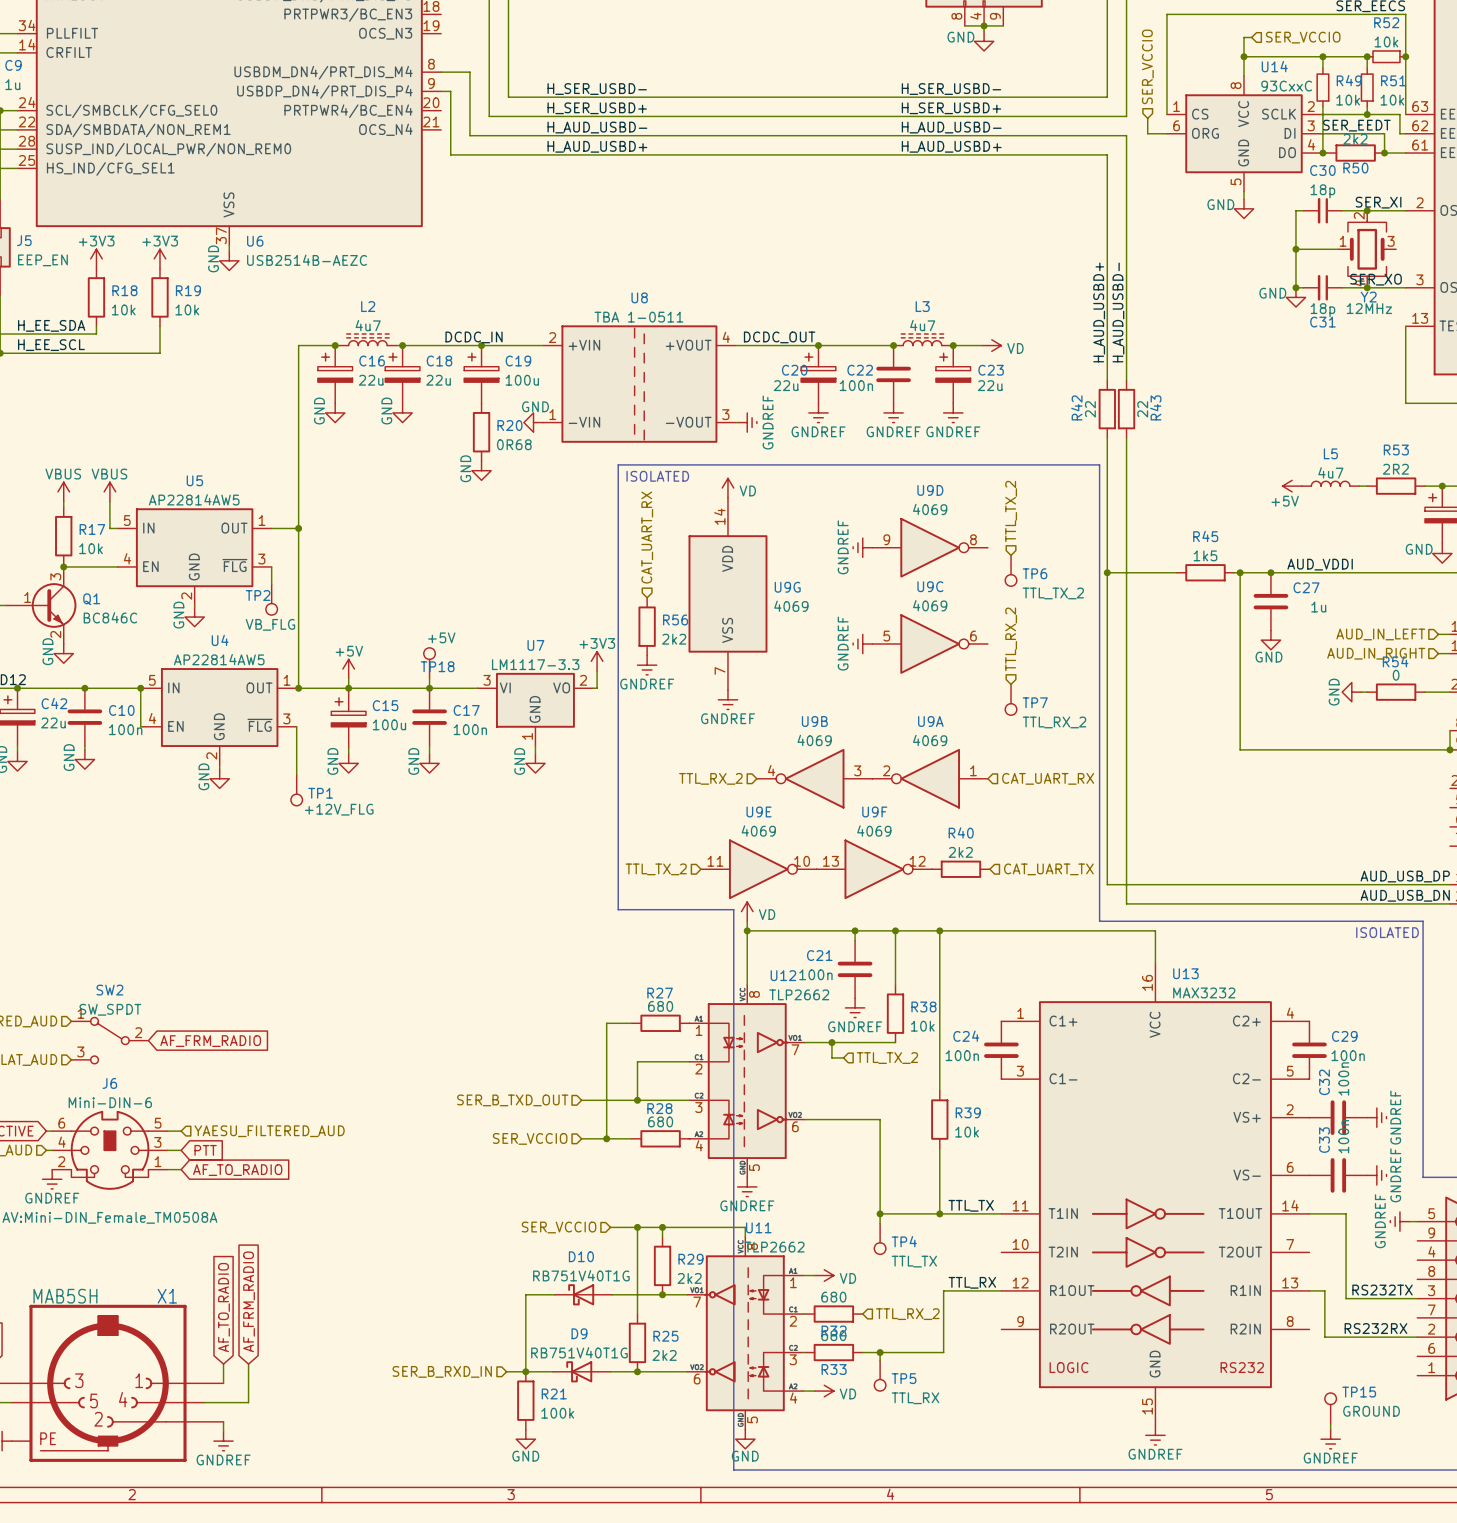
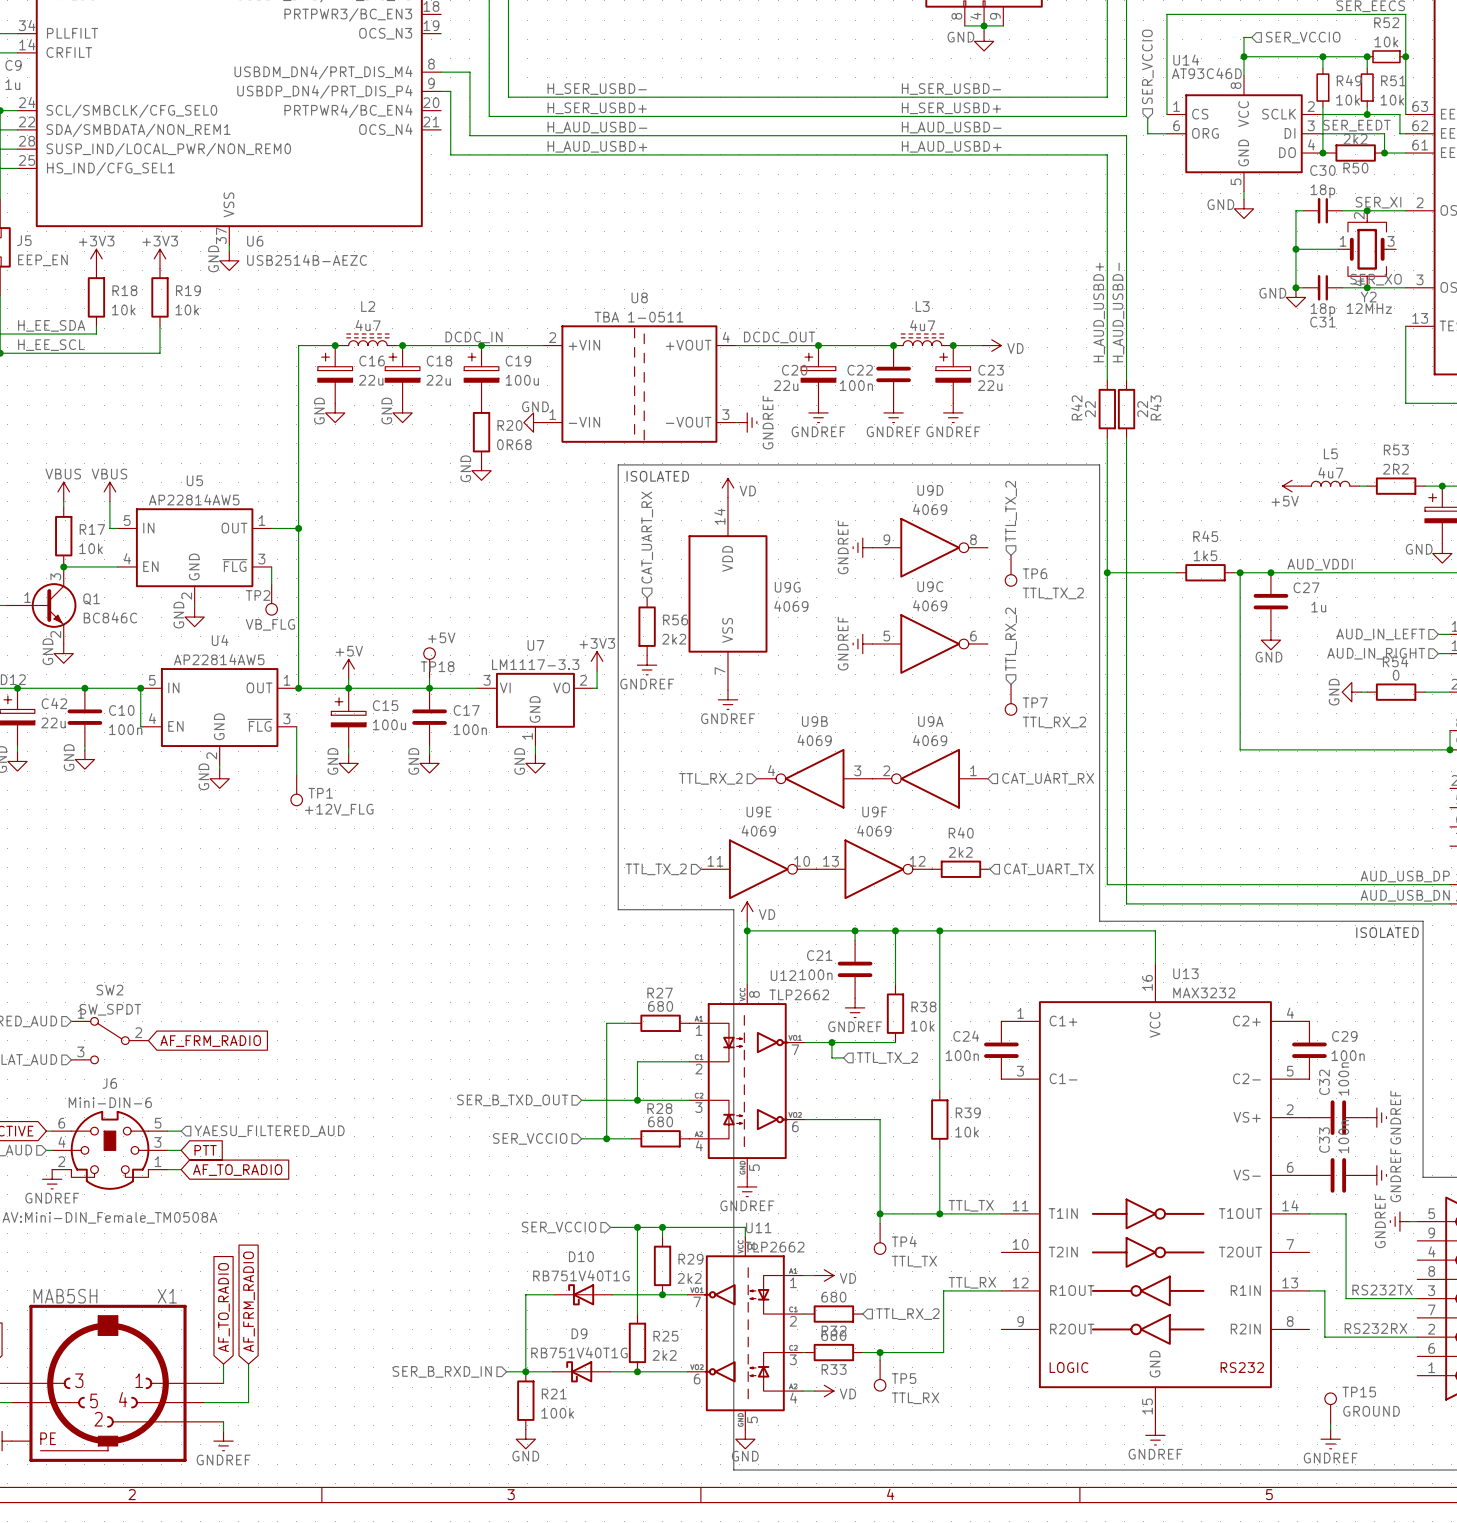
U14 name position: U14 (1274, 66) -> U14 (1186, 60)
U14 value: 93CxxC (1286, 86) -> AT93C46D (1206, 73)

